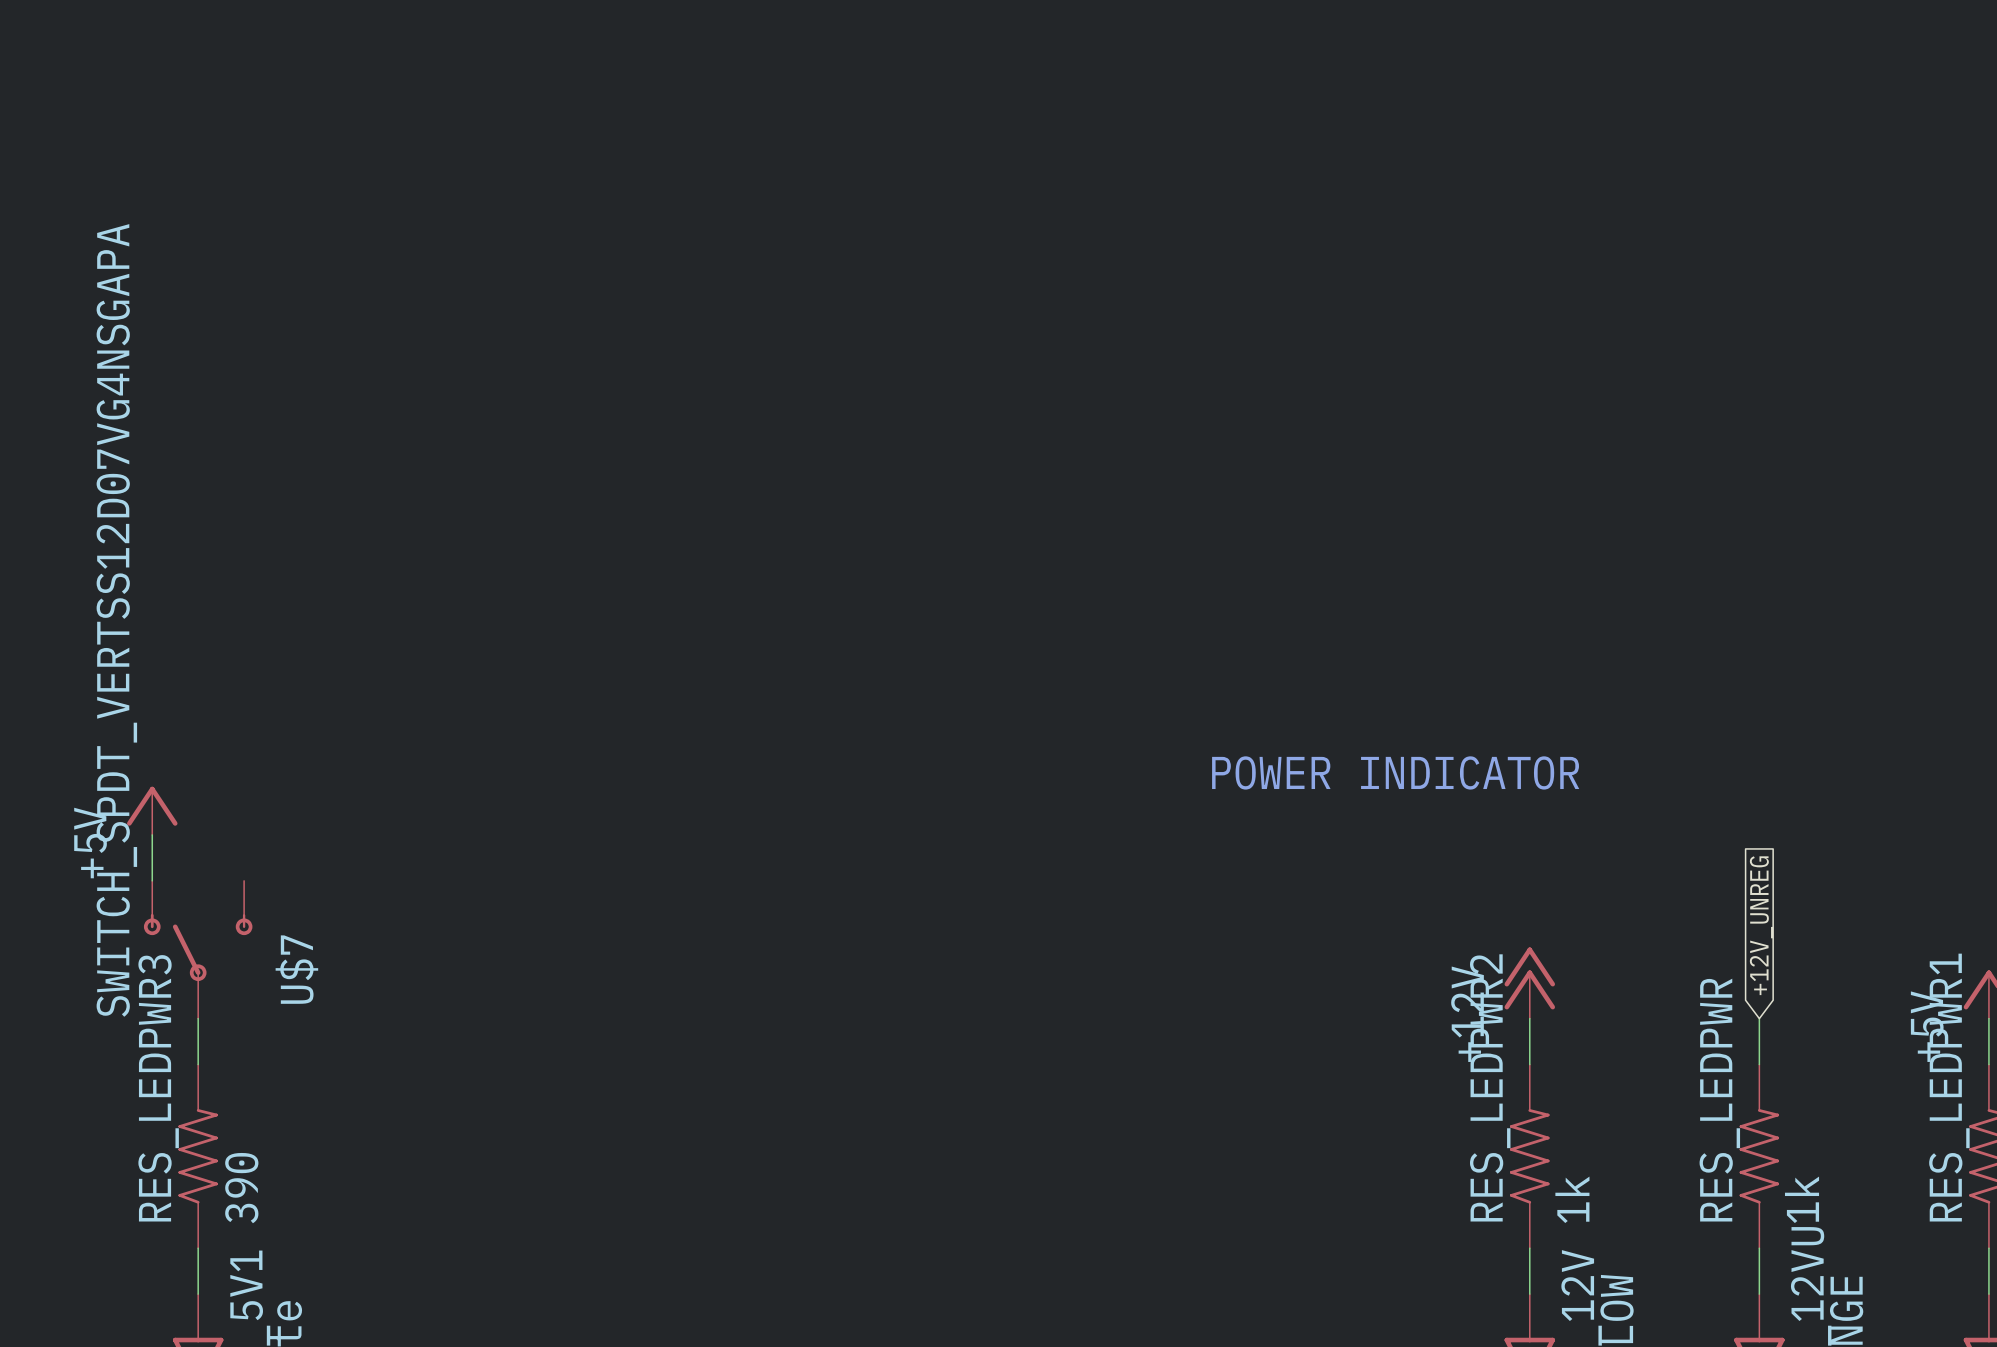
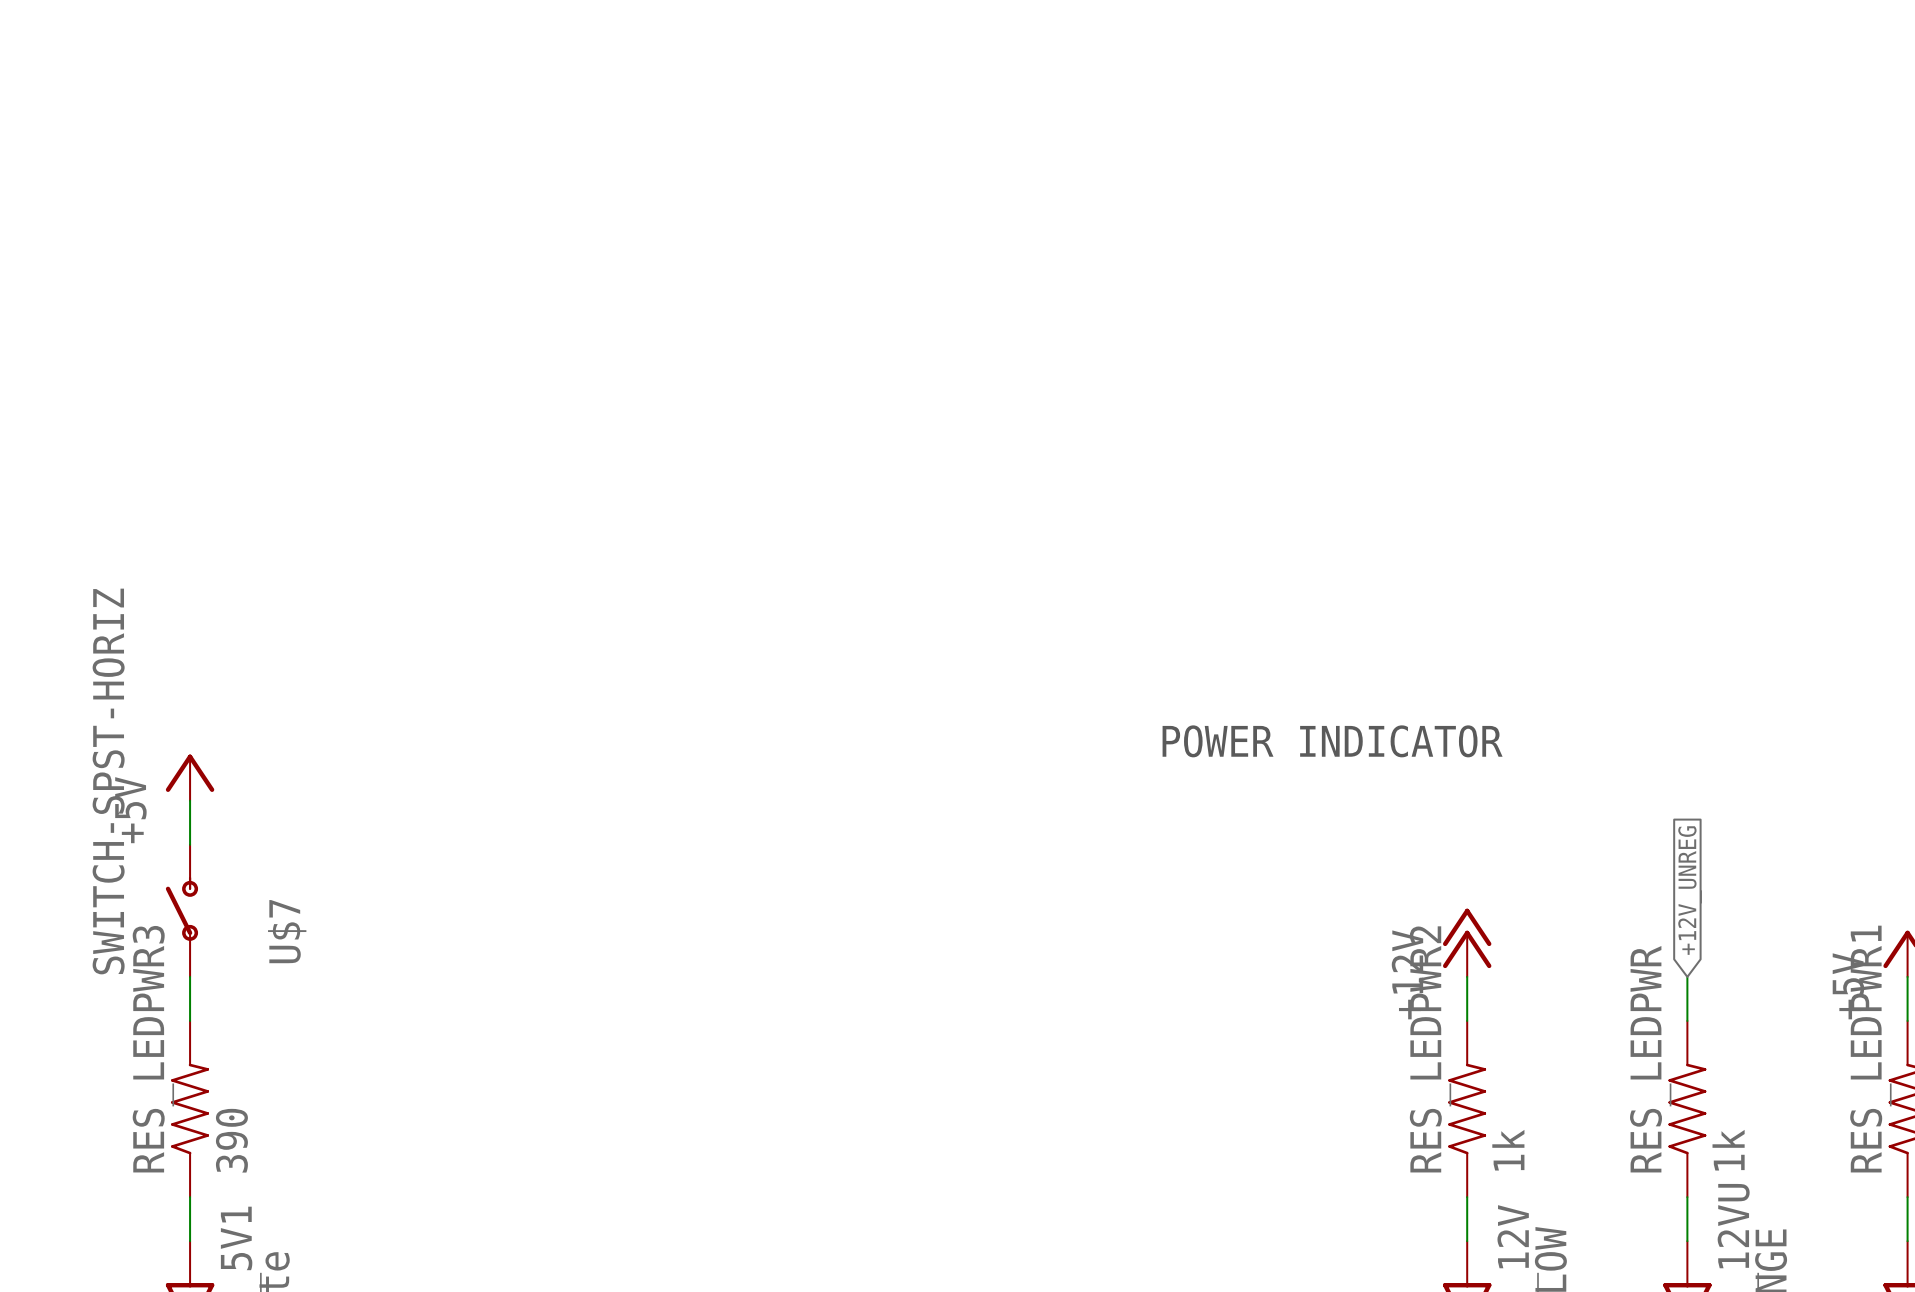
U$7 value: SWITCH_SPDT_VERTSS12D07VG4NSGAPA (116, 620) -> SWITCH-SPST-HORIZ (108, 781)
power symbol position: +5V (152, 810) -> +5V (190, 777)
wire: (152, 834) (152, 880) -> (190, 800) (190, 844)
U$7 symbol: [143, 880, 253, 1019] -> [165, 844, 199, 977]

